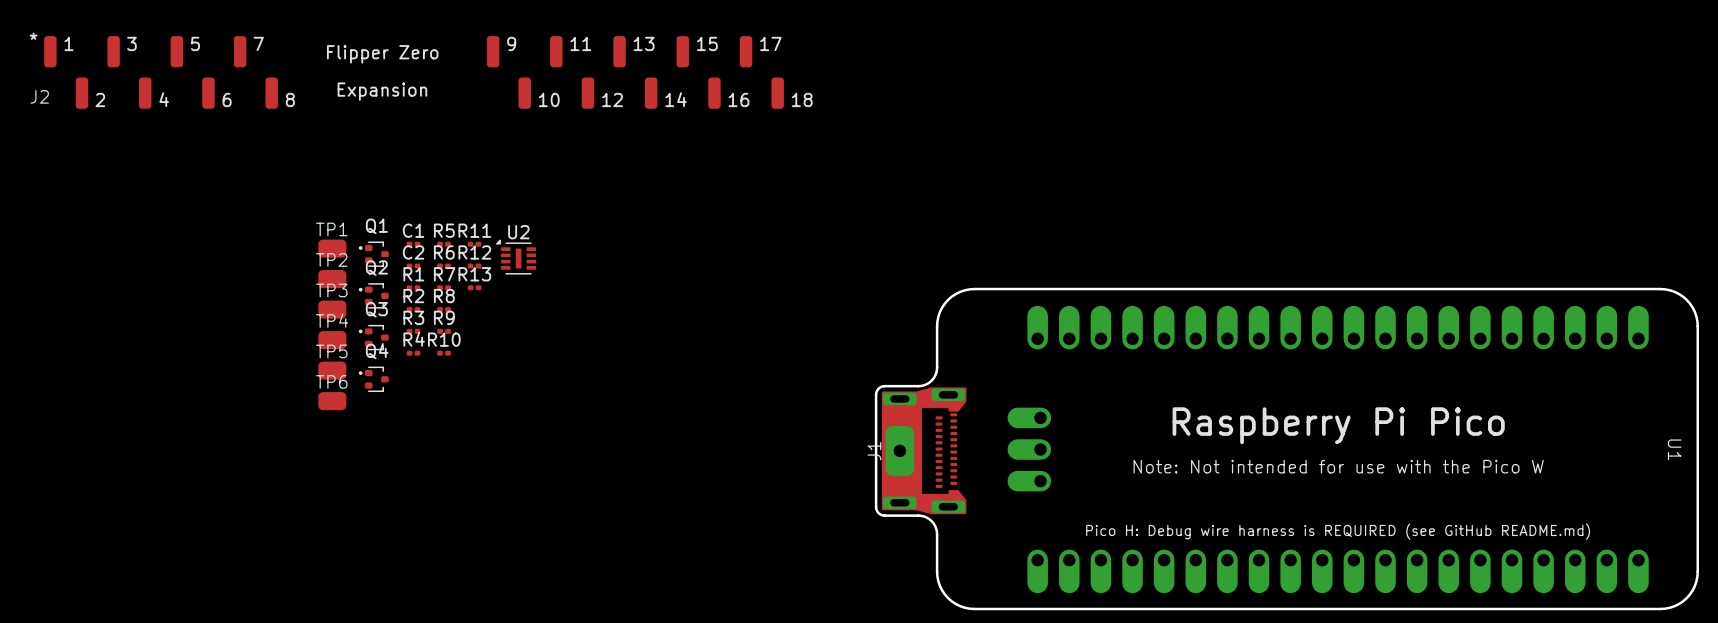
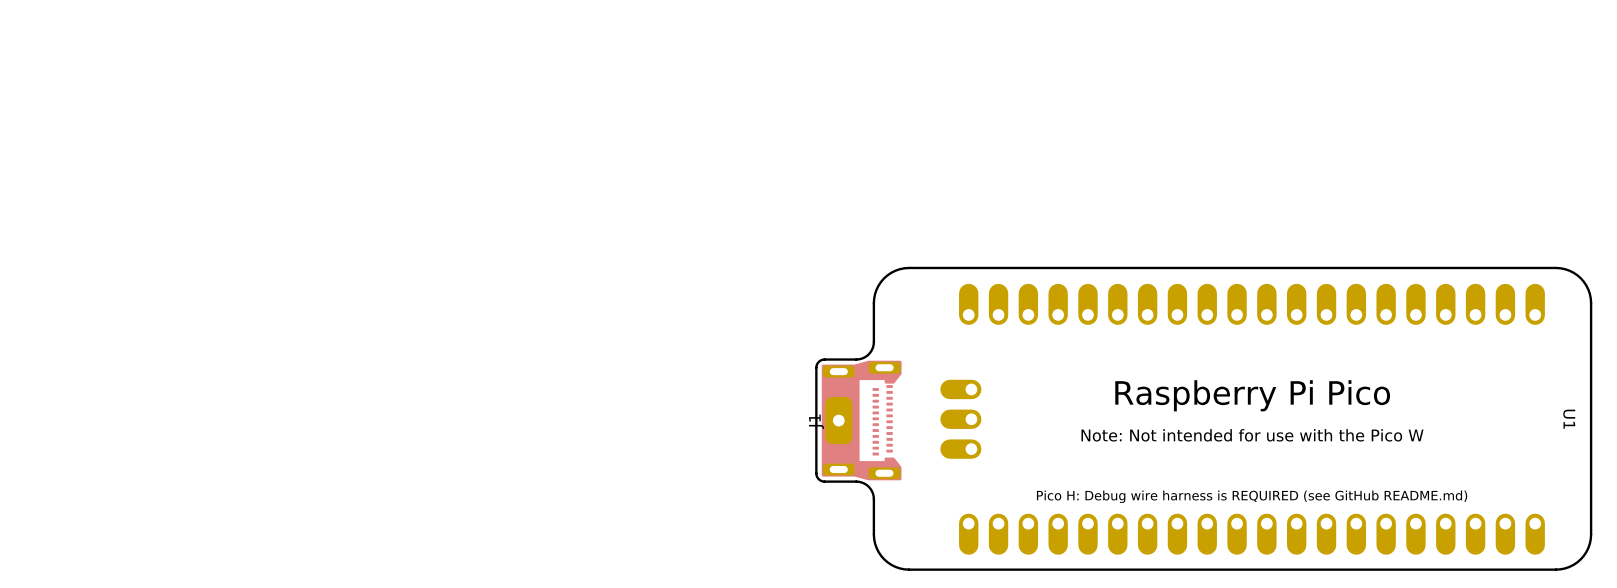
J2: (414, 72) -> none
C1: (413, 244) -> none
R5: (444, 244) -> none
R11: (474, 244) -> none
TP1: (332, 248) -> none
Q1: (373, 254) -> none
U2: (515, 257) -> none
C2: (413, 266) -> none
R6: (444, 266) -> none
R12: (474, 266) -> none
TP2: (332, 279) -> none
R1: (413, 287) -> none
R7: (444, 287) -> none
R13: (474, 287) -> none
Q2: (373, 295) -> none
TP3: (332, 309) -> none
R2: (413, 309) -> none
R8: (444, 309) -> none
R3: (413, 331) -> none
R9: (444, 331) -> none
Q3: (373, 337) -> none
TP4: (332, 340) -> none
R4: (413, 353) -> none
R10: (444, 353) -> none
TP5: (332, 370) -> none
Q4: (373, 379) -> none
TP6: (332, 401) -> none

